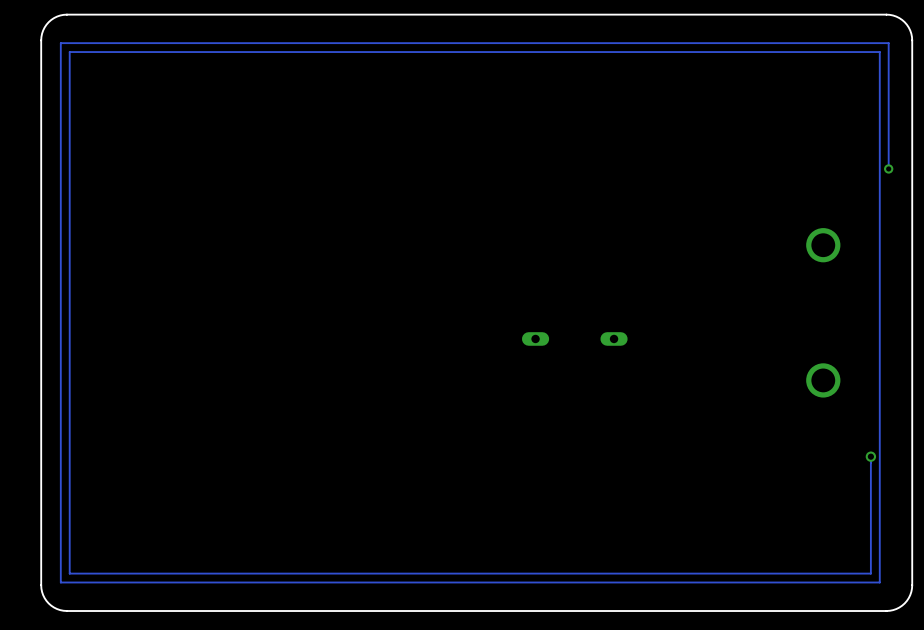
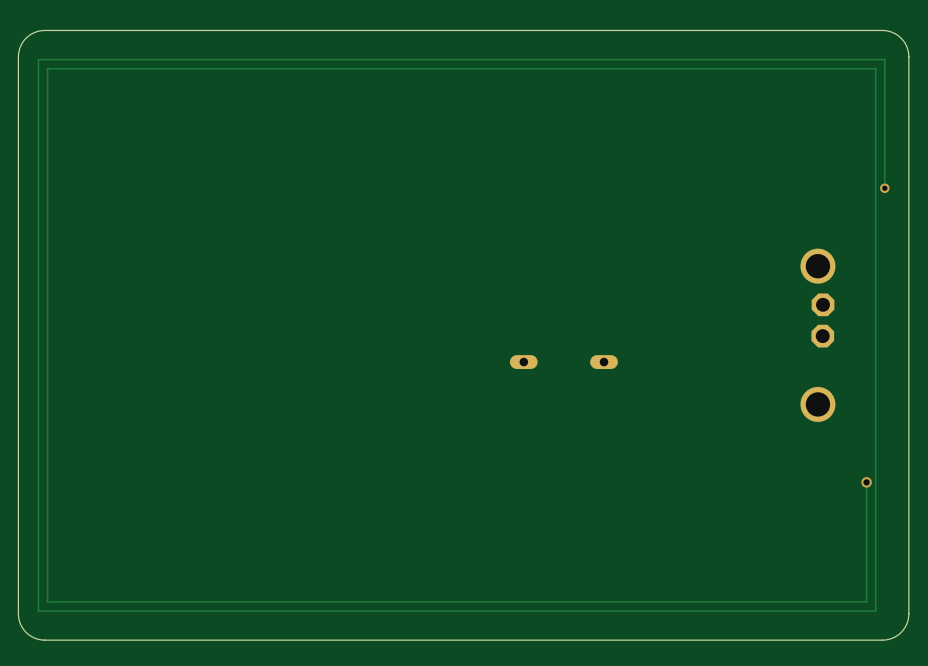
part: none -> (823, 304)
part: none -> (822, 336)

